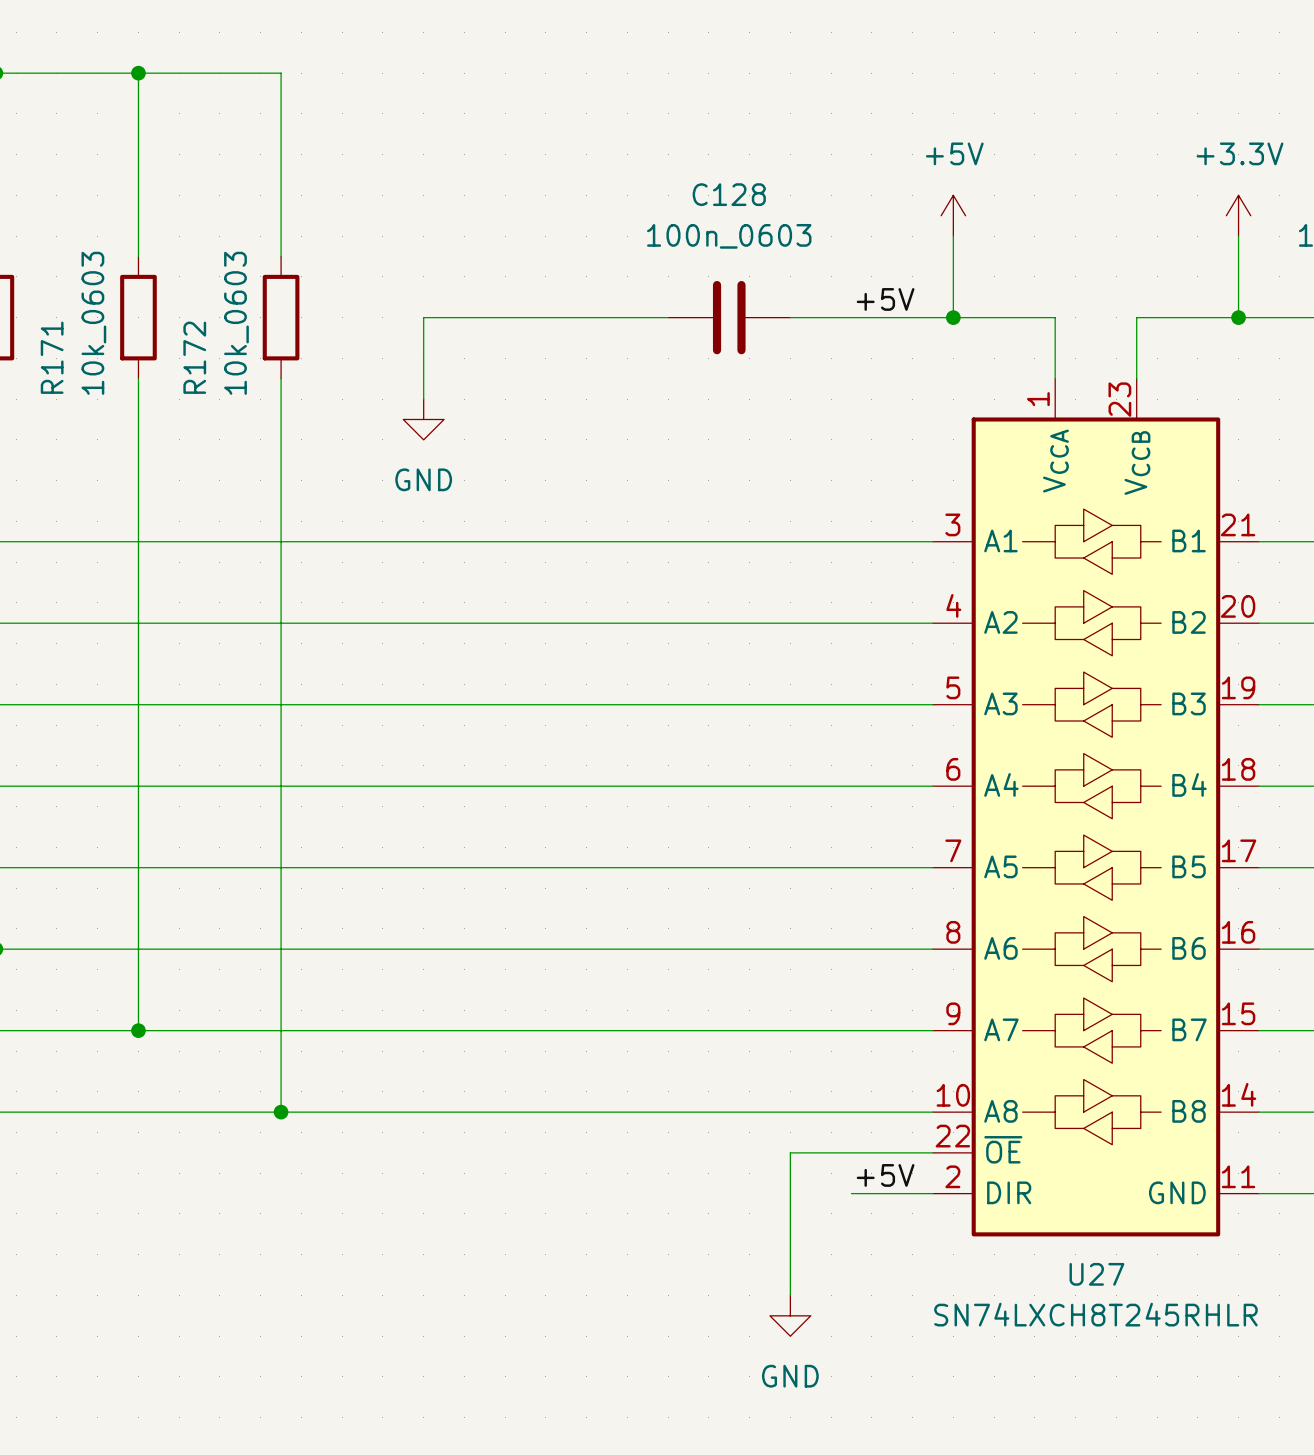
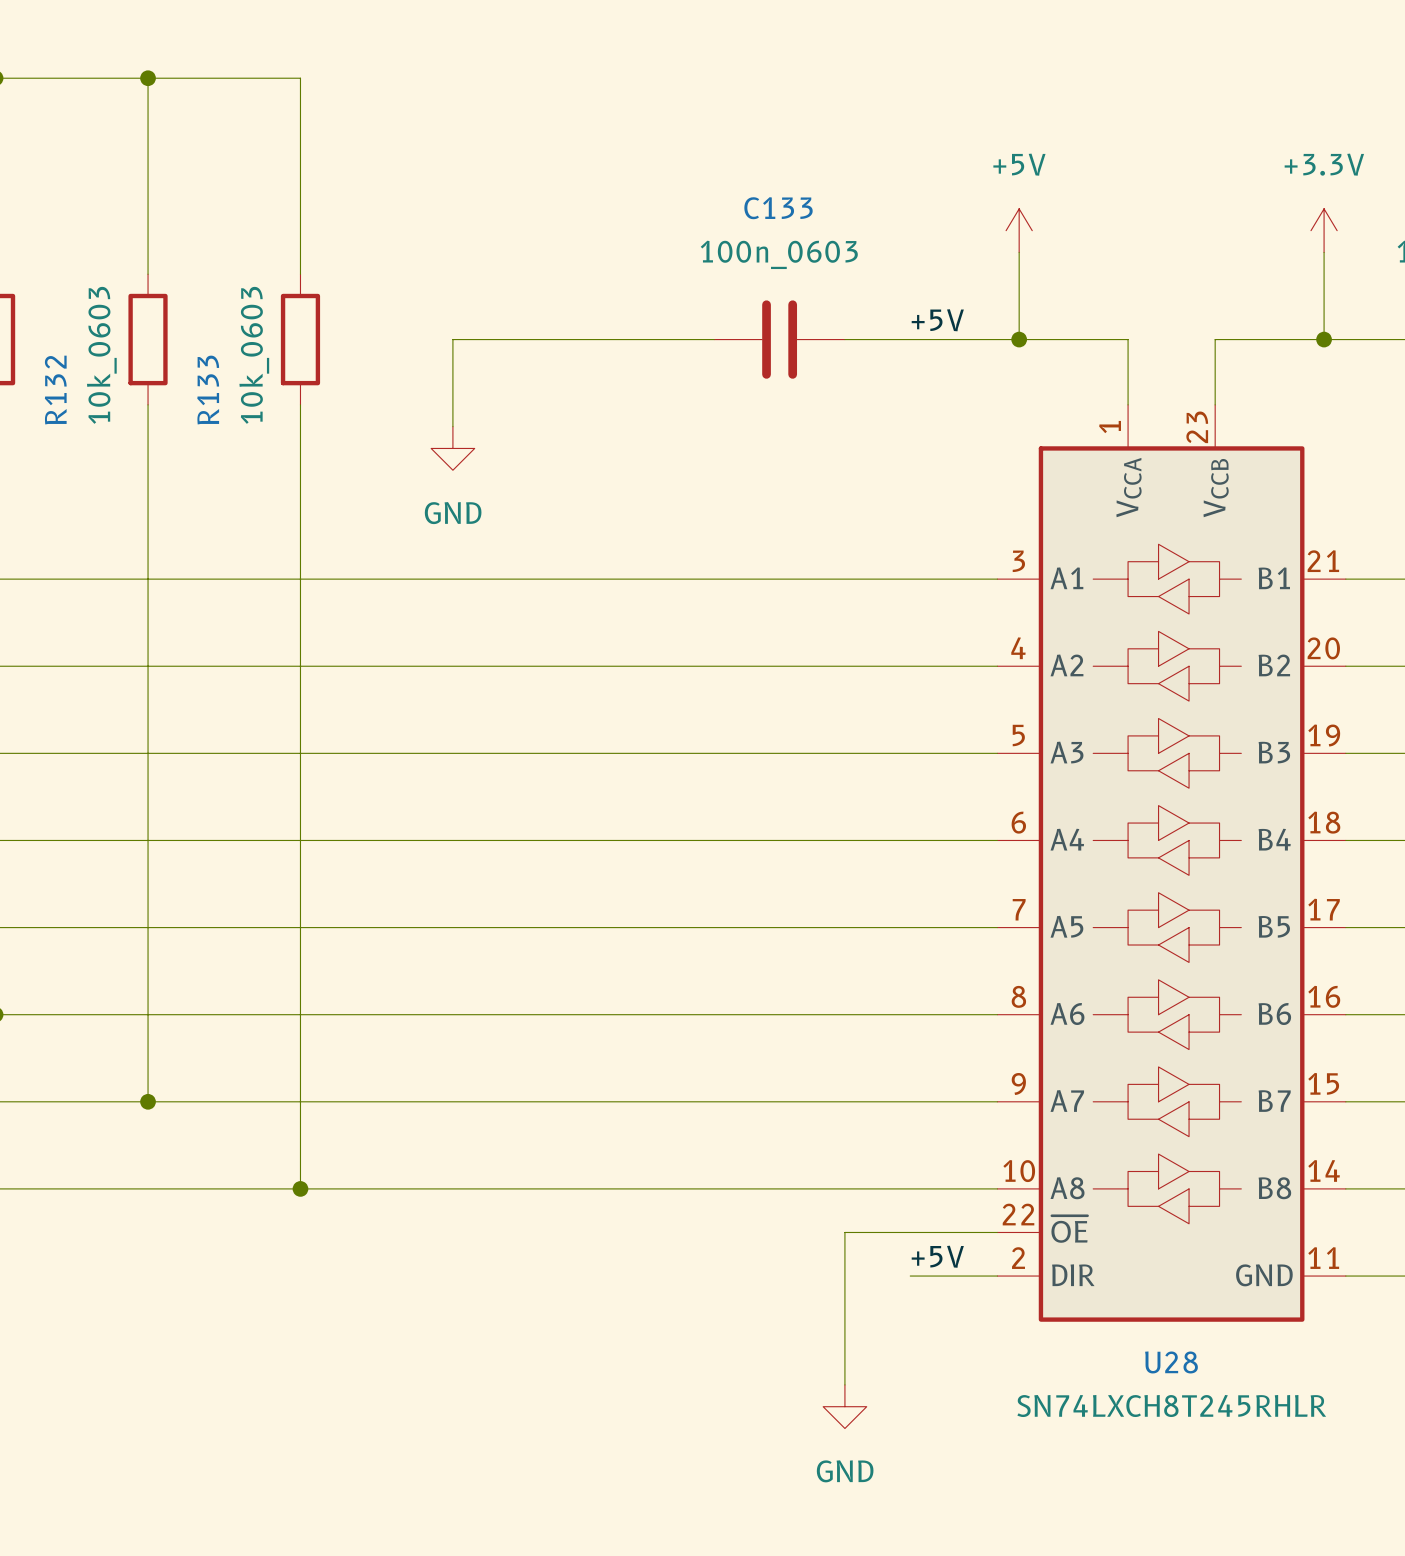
C128 name: C128 (729, 194) -> C133 (778, 208)
R171 name: R171 (52, 357) -> R132 (55, 390)
R172 name: R172 (194, 357) -> R133 (208, 390)
U27 name: U27 (1096, 1274) -> U28 (1171, 1362)

